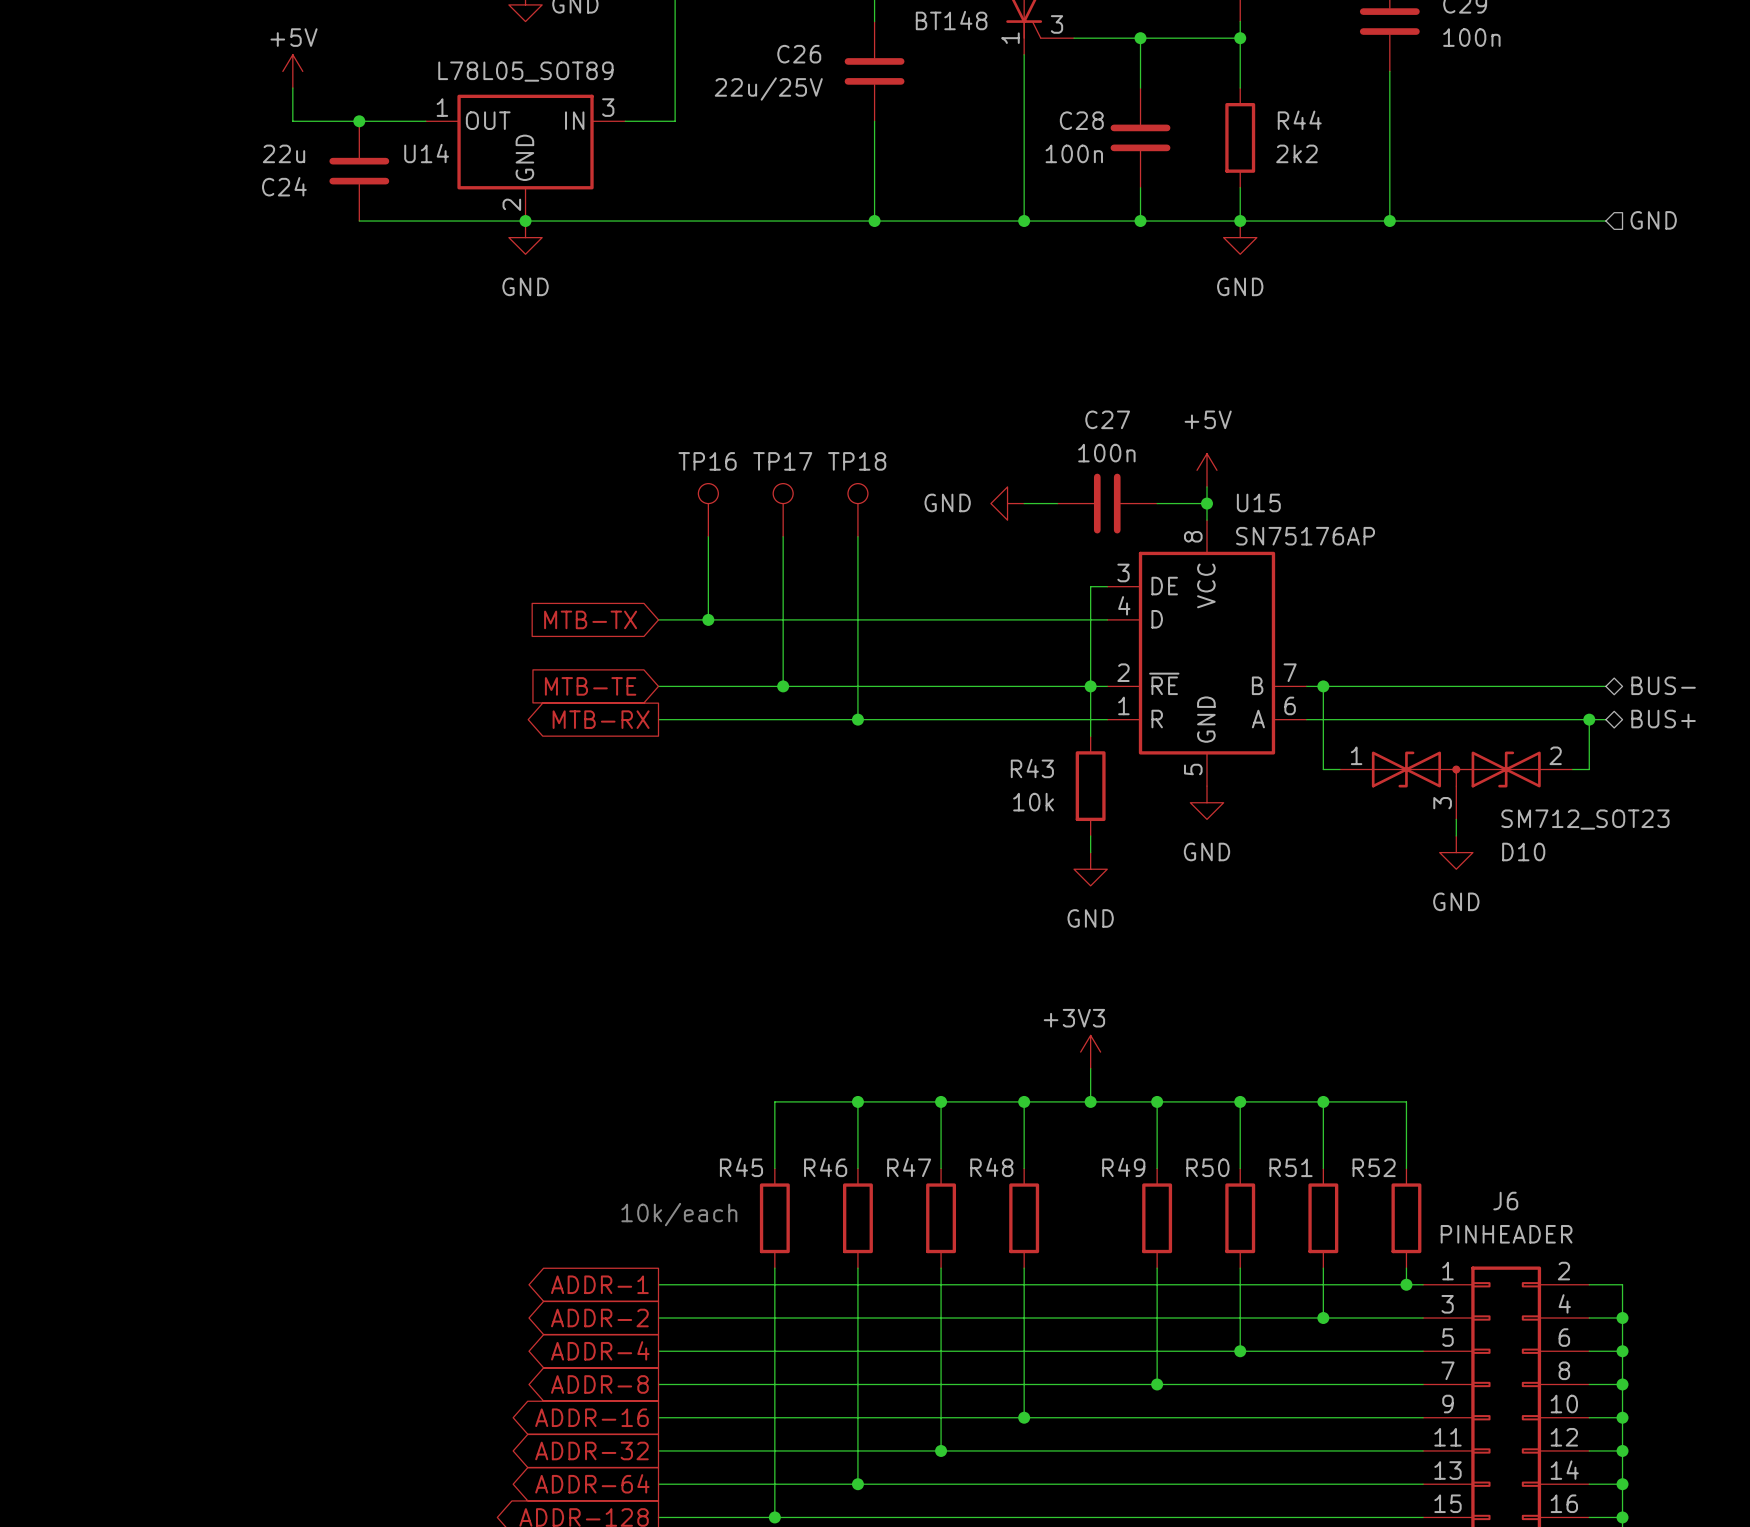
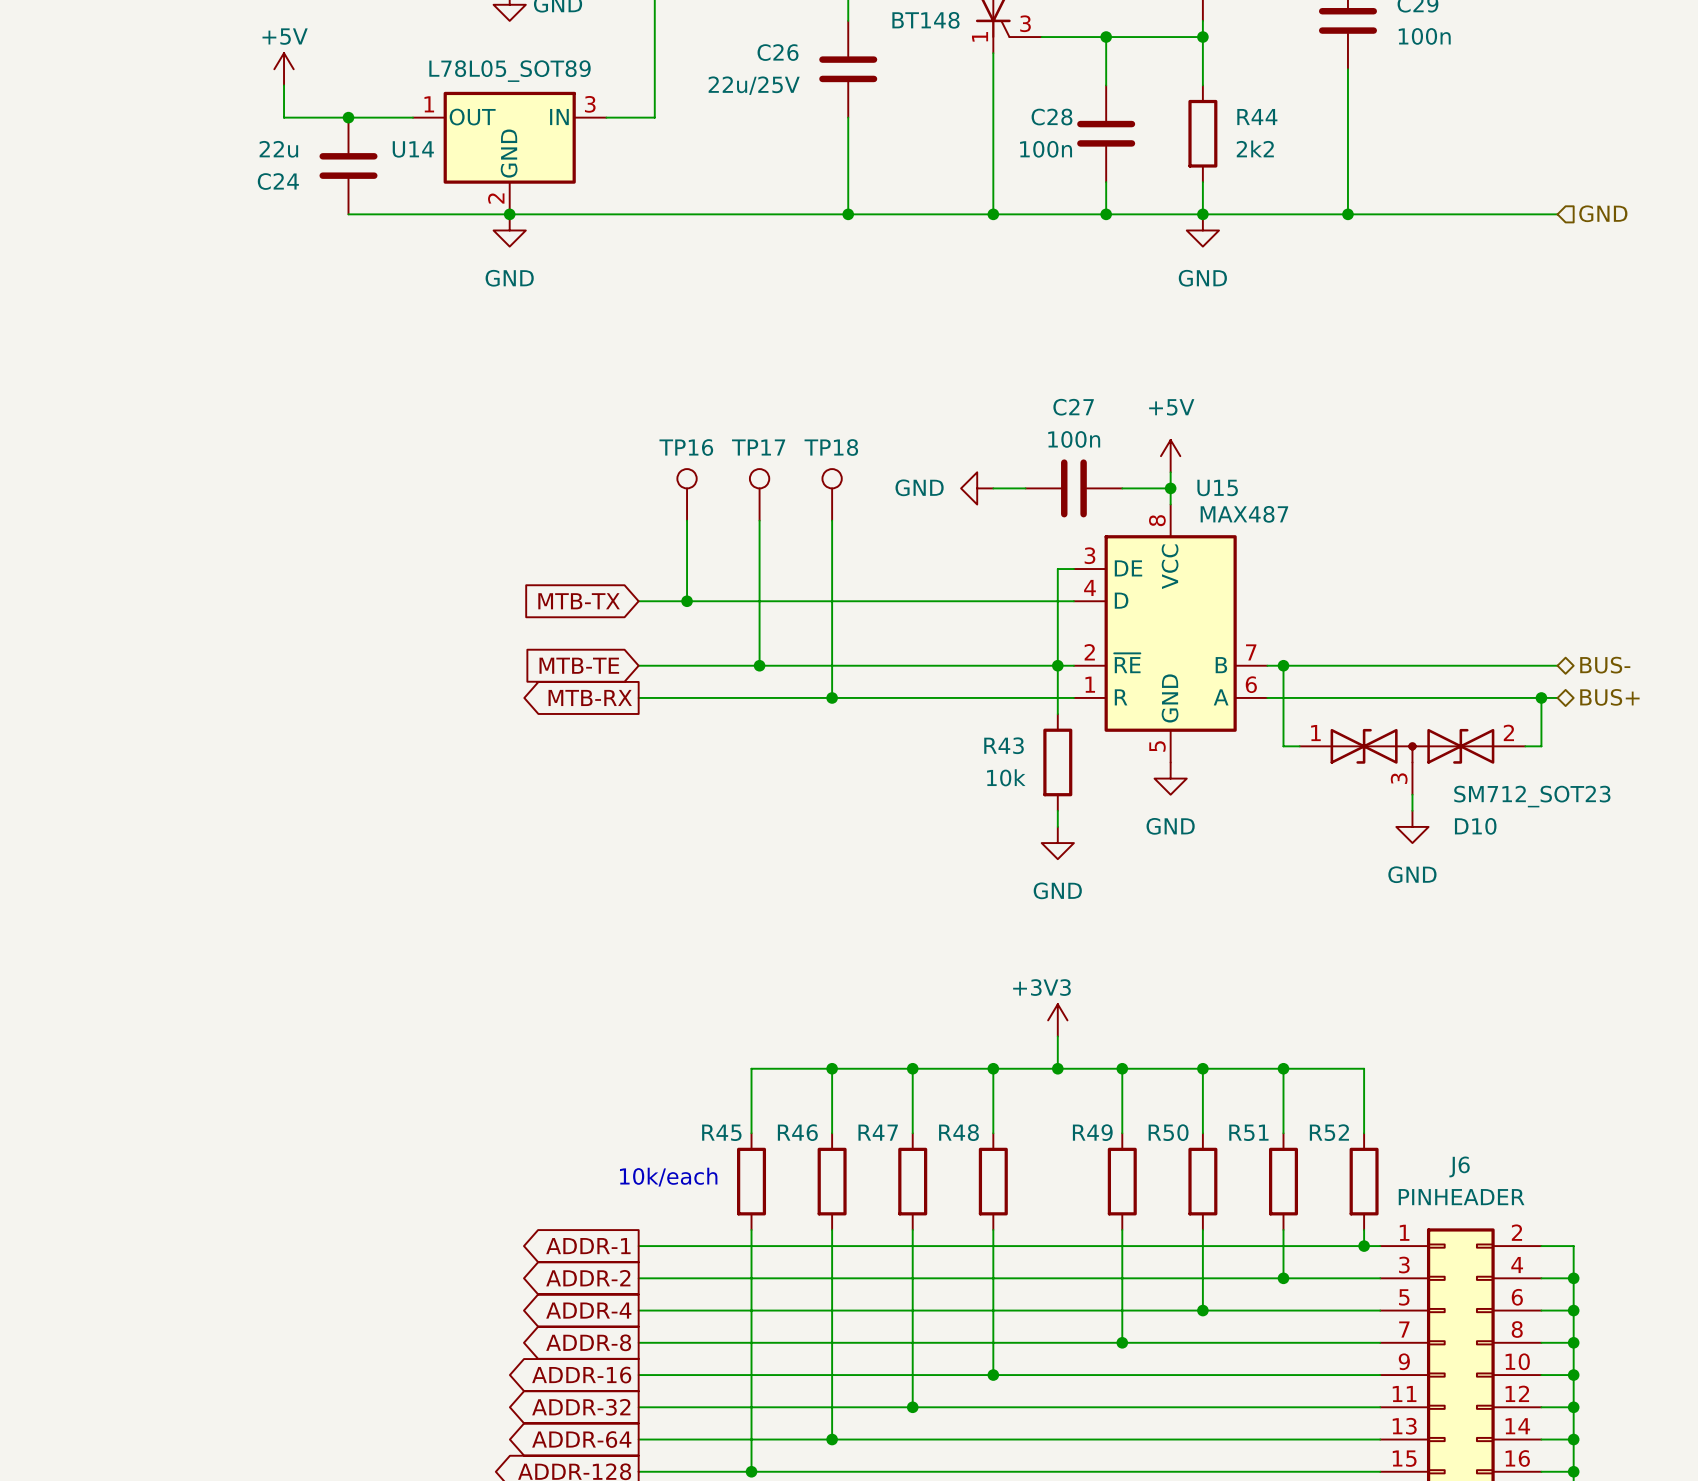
U15 value: SN75176AP (1305, 536) -> MAX487 (1244, 514)

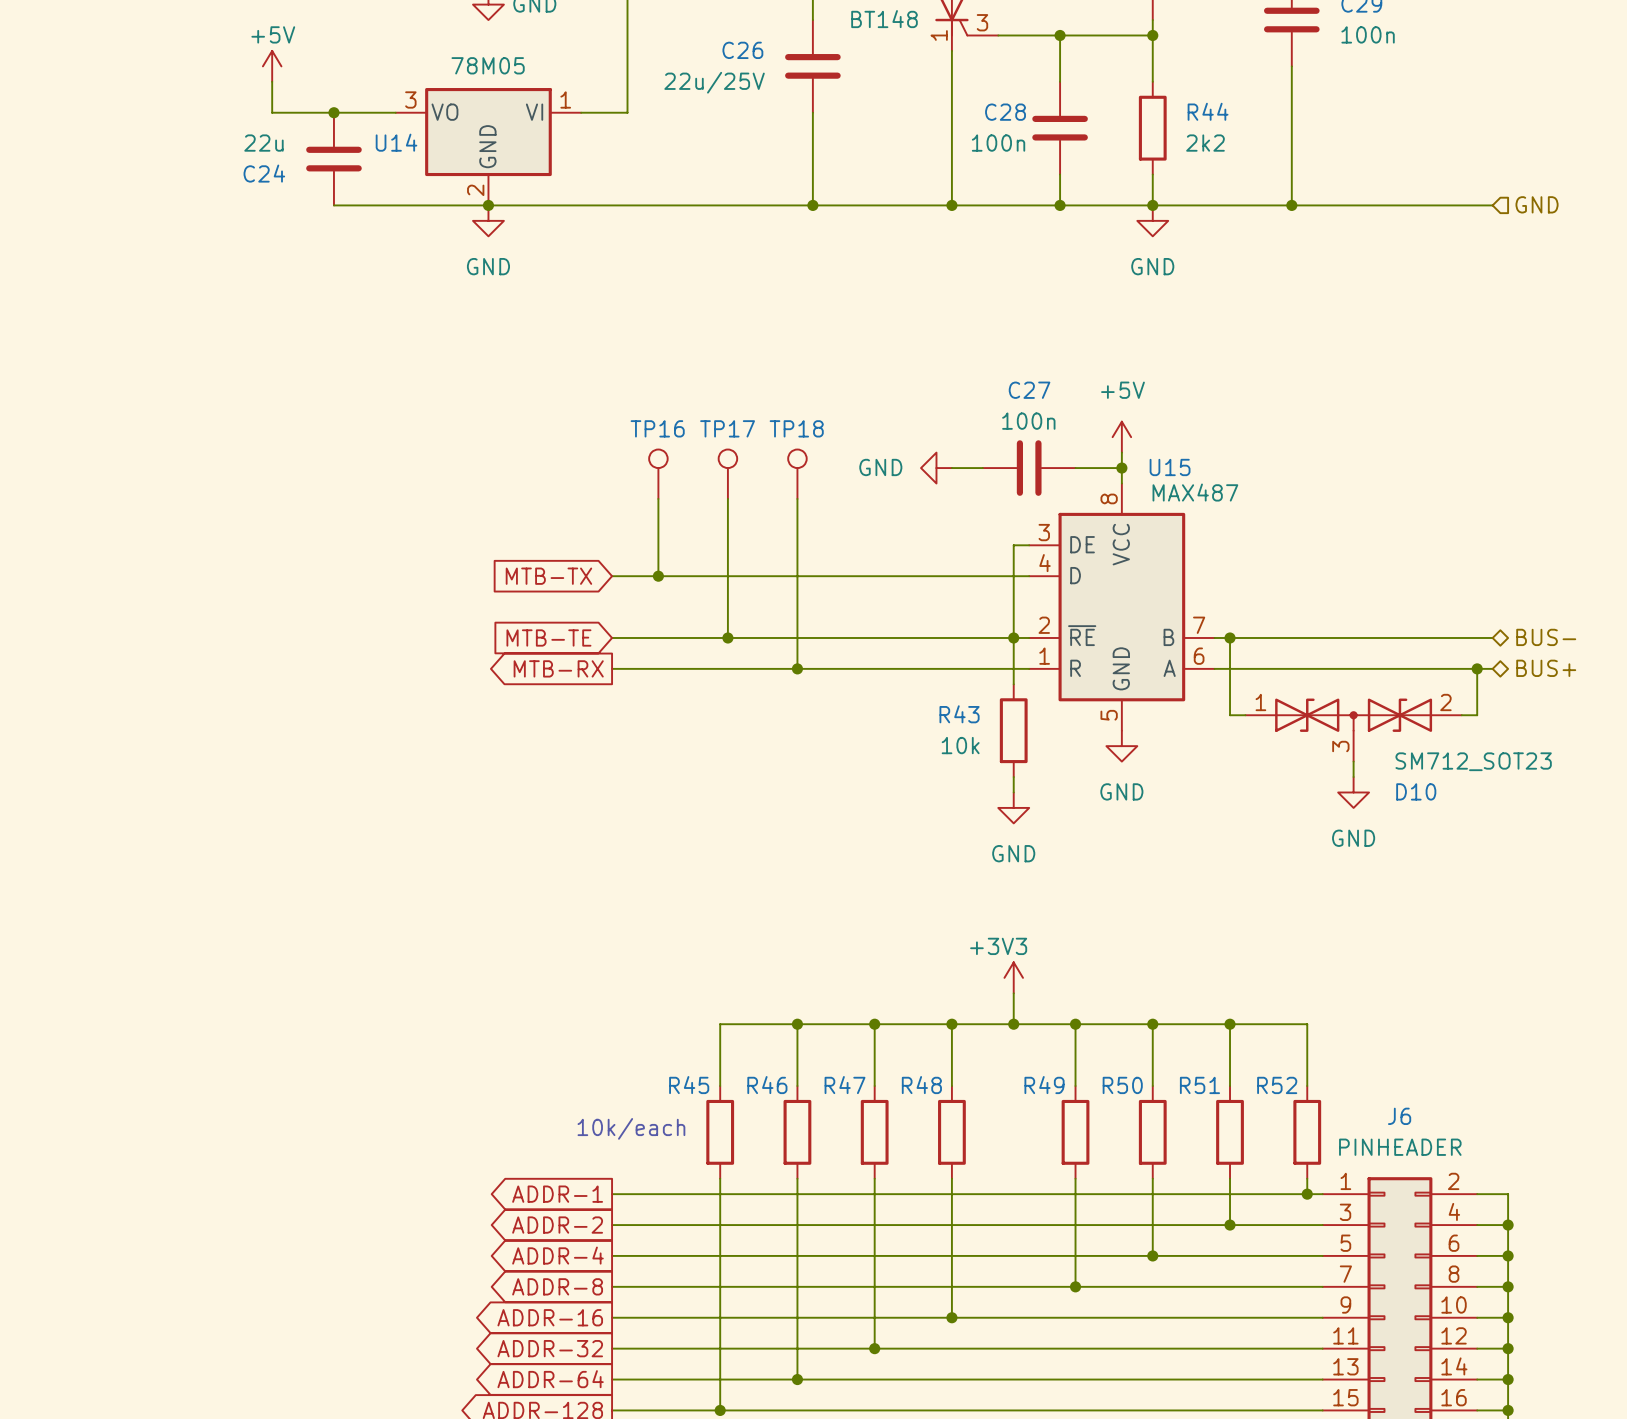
U14 value: L78L05_SOT89 (510, 71) -> 78M05 (488, 65)
U14 pin number: 1 (429, 104) -> 3 (410, 99)
U14 pin number: 3 (590, 104) -> 1 (565, 99)
U14 pin name: OUT (472, 117) -> VO (444, 112)
U14 pin name: IN (559, 117) -> VI (534, 112)

